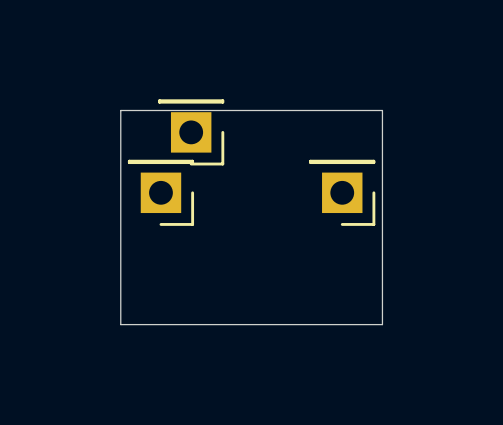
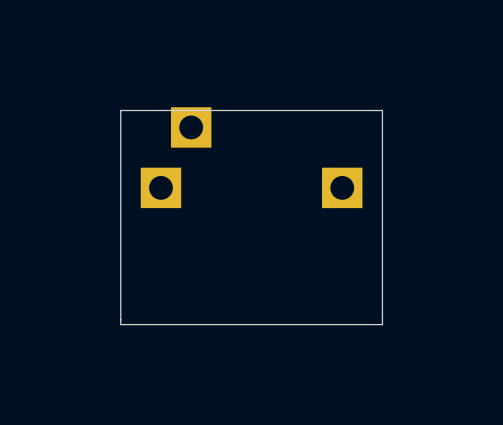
part side: bottom (191, 132) -> top (191, 127)
part side: bottom (160, 192) -> top (160, 187)
part side: bottom (342, 192) -> top (342, 187)

